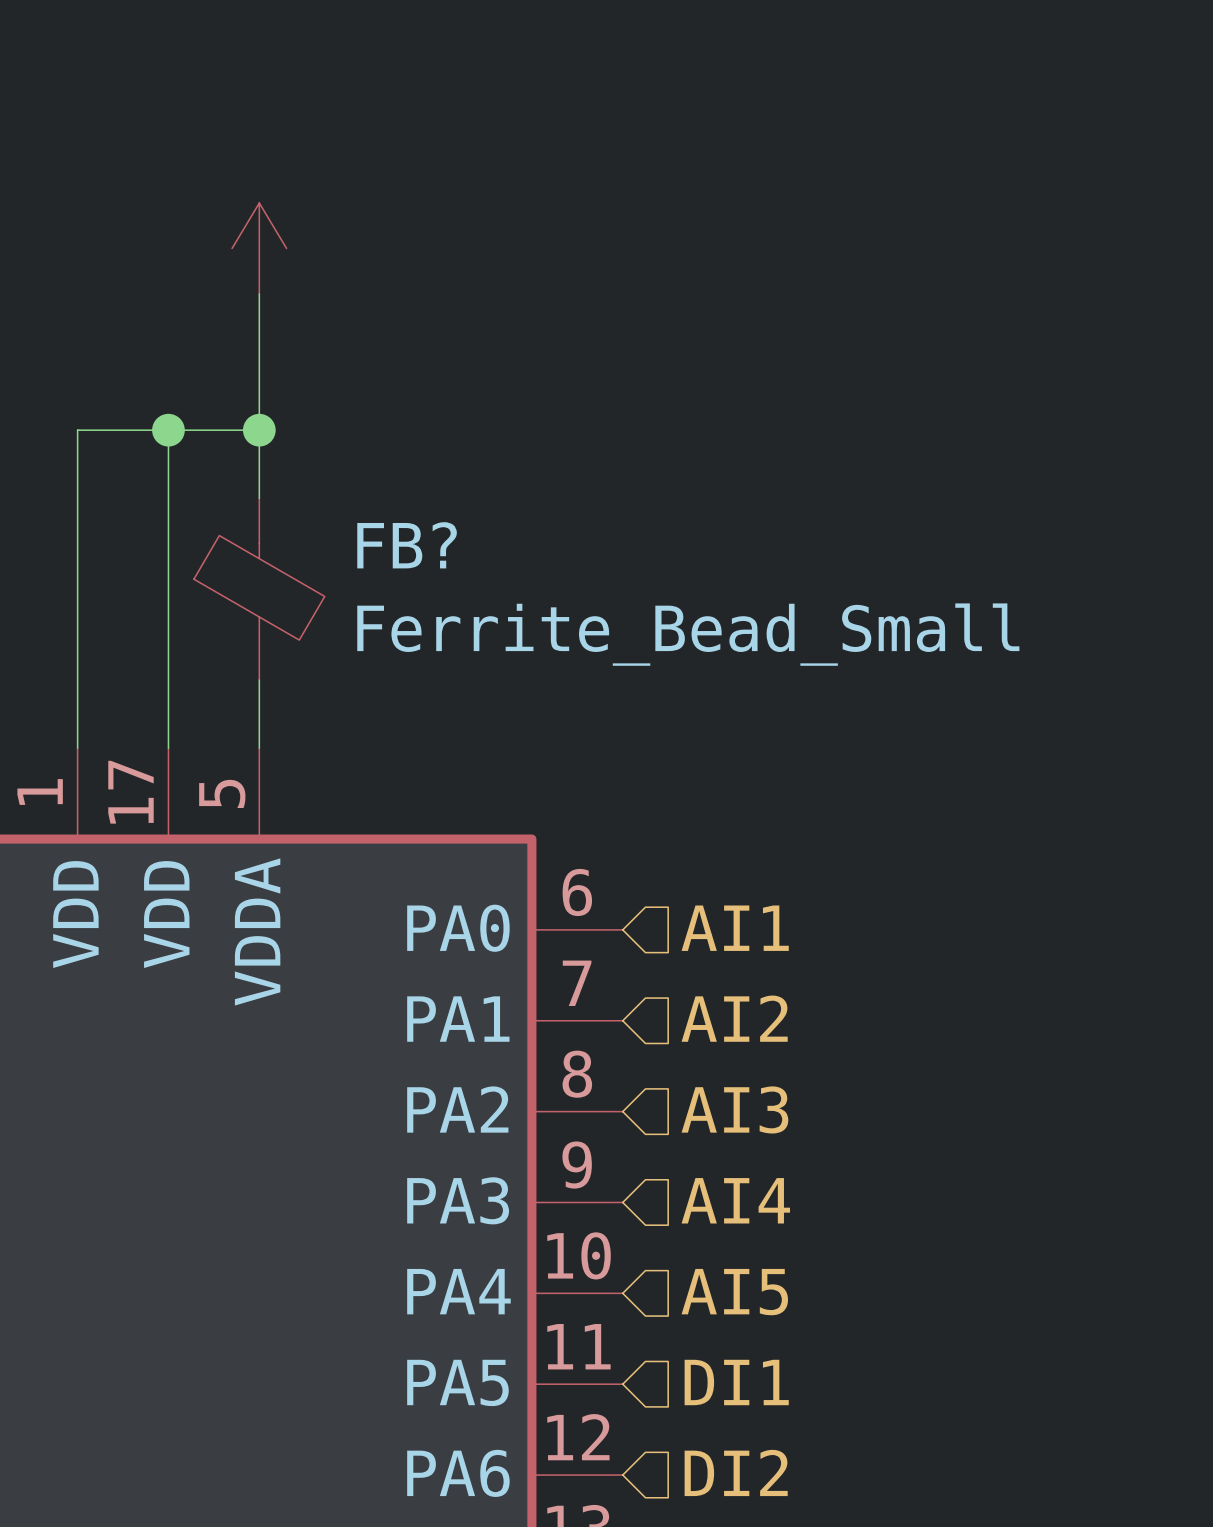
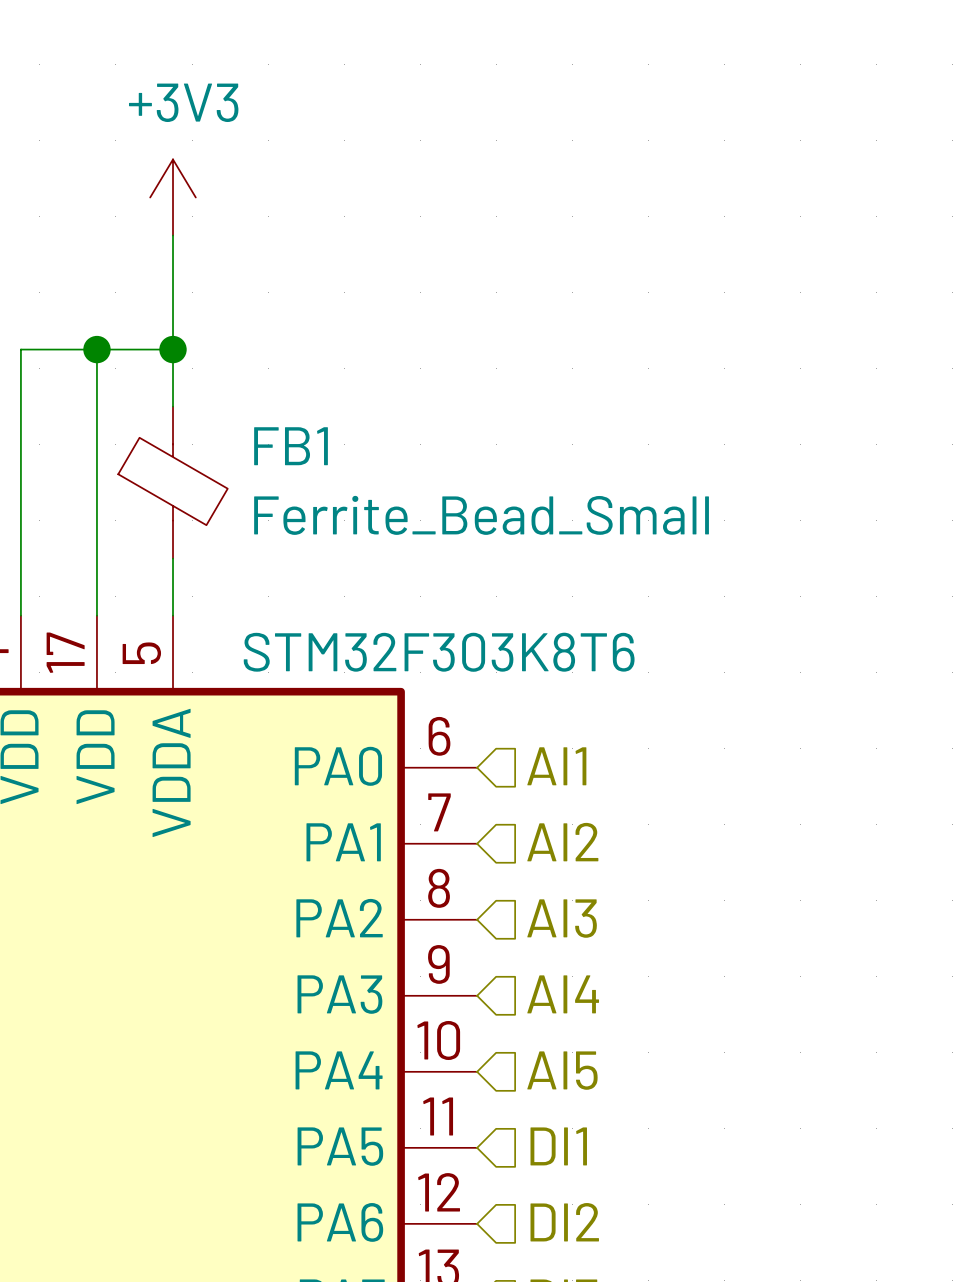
power symbol text: none -> +3V3 (183, 102)
FB? name: FB? (407, 545) -> FB1 (291, 446)
part value: none -> STM32F303K8T6 (439, 652)

